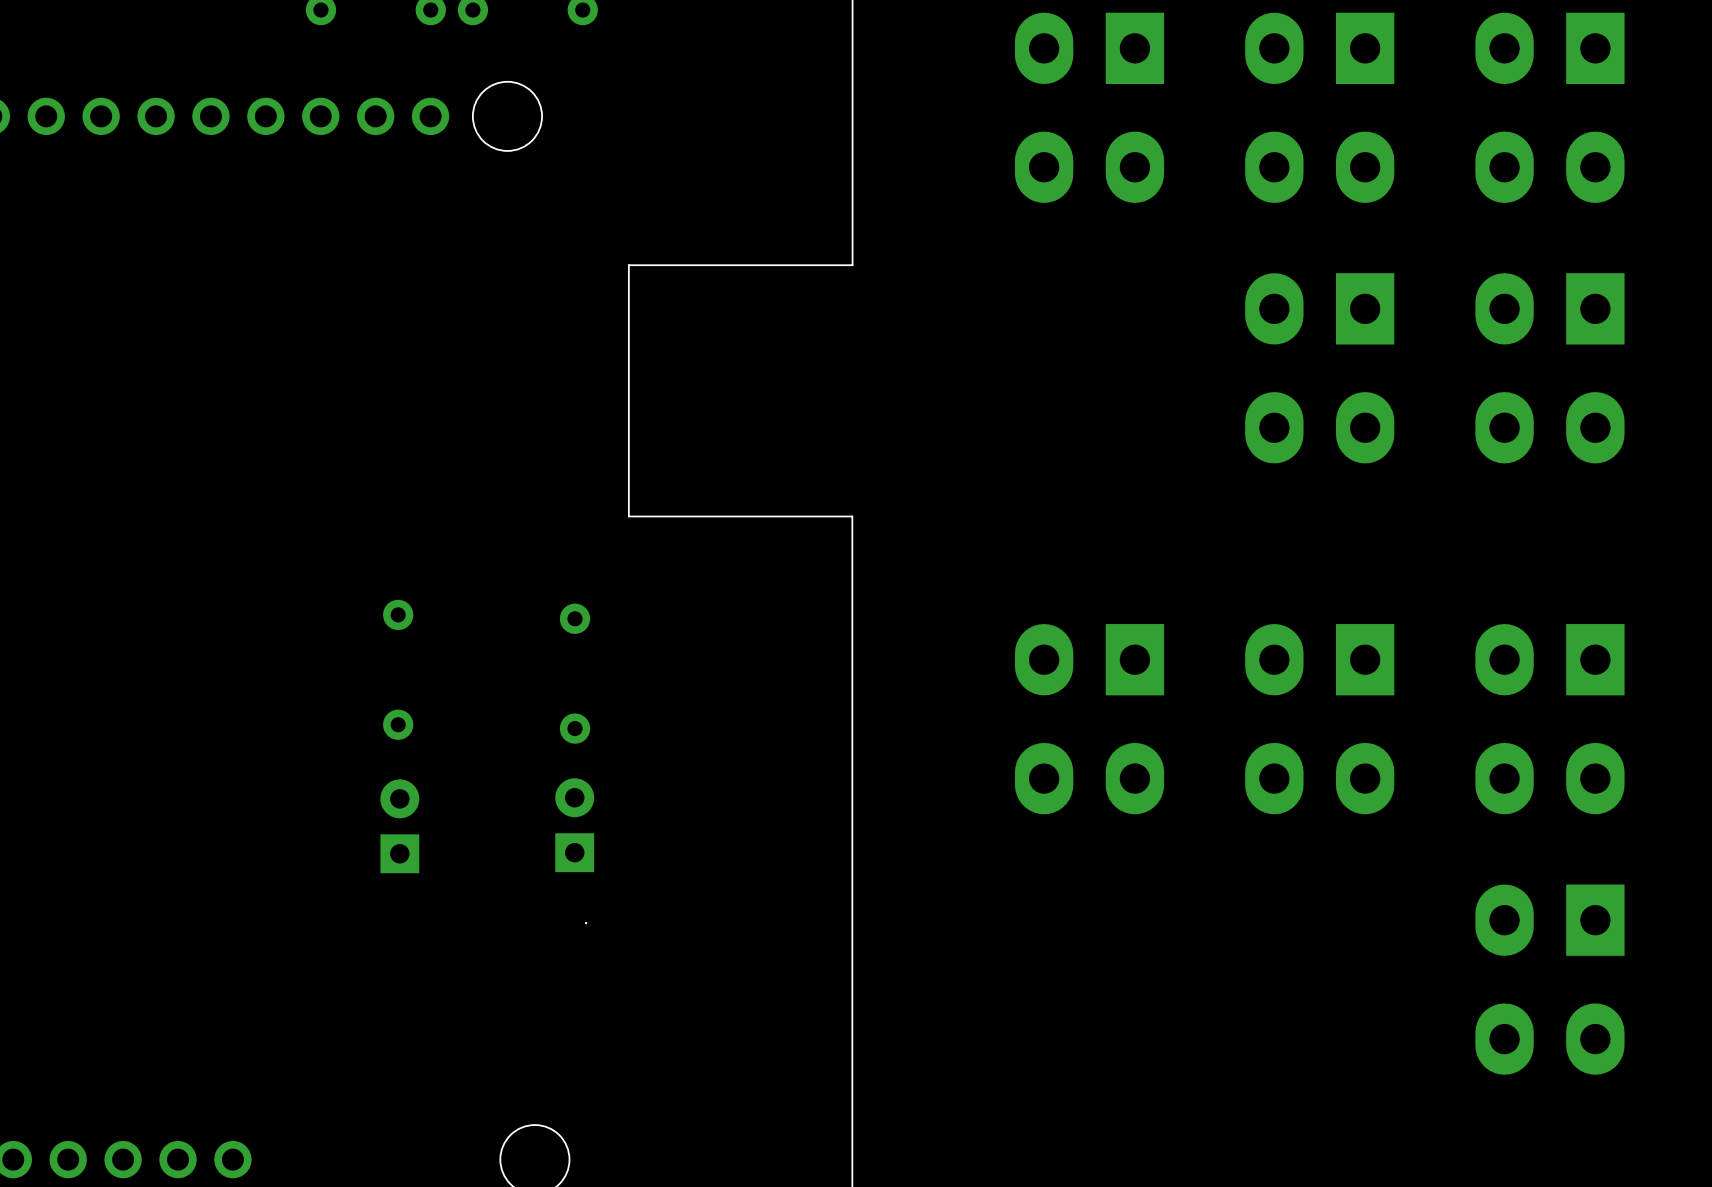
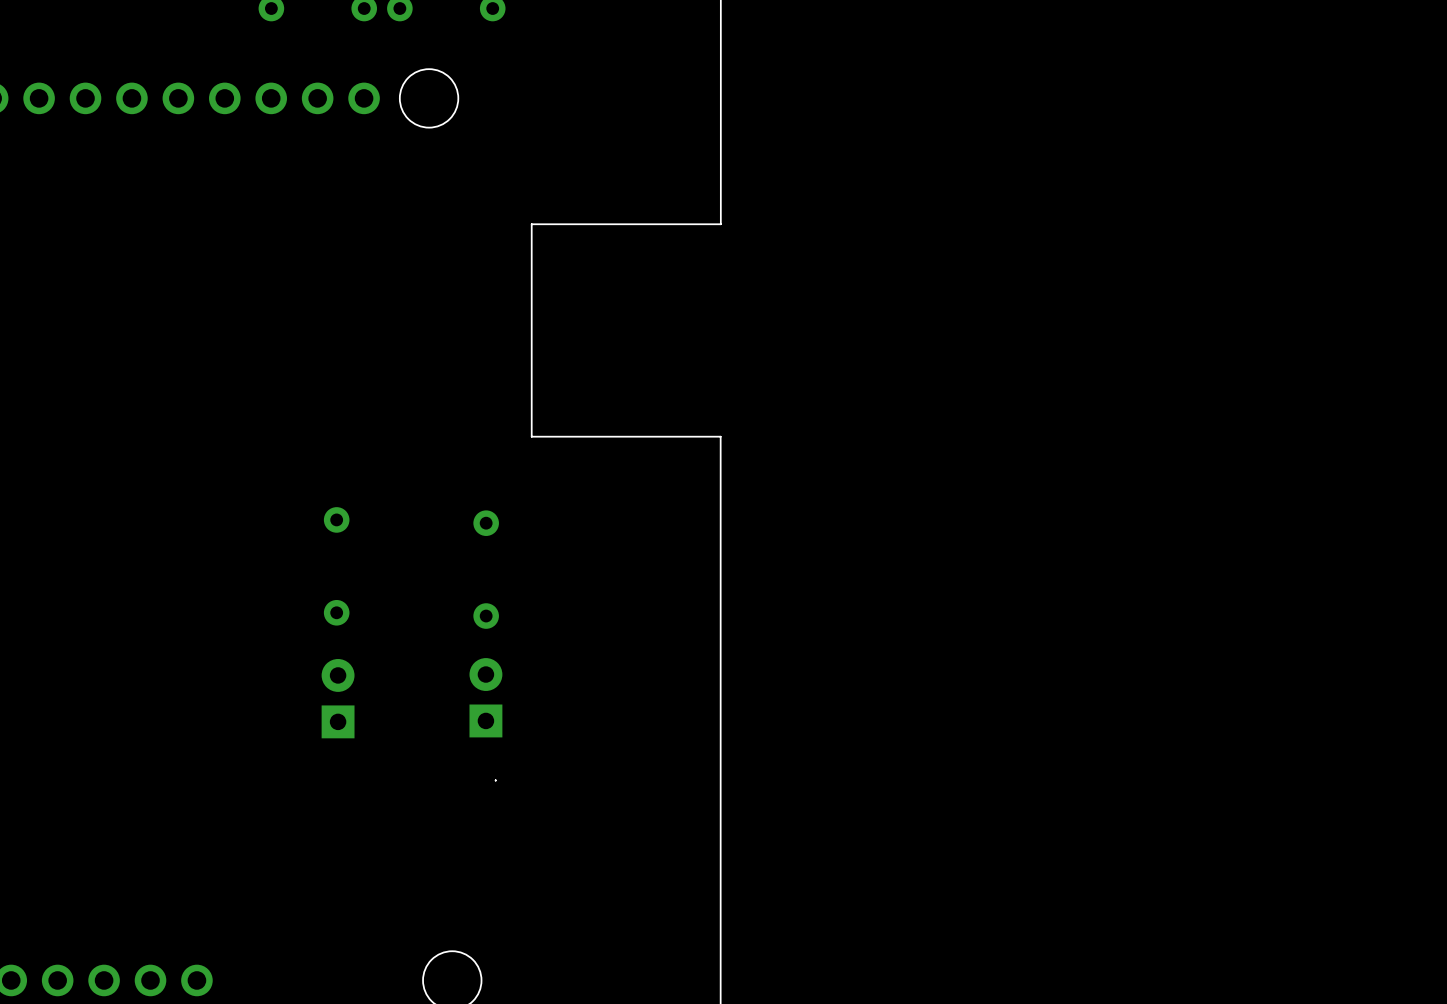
part: (1089, 107) -> none
part: (1319, 107) -> none
part: (1549, 107) -> none
part: (1319, 368) -> none
part: (1549, 368) -> none
part: (1089, 719) -> none
part: (1319, 719) -> none
part: (1549, 719) -> none
part: (1549, 979) -> none

